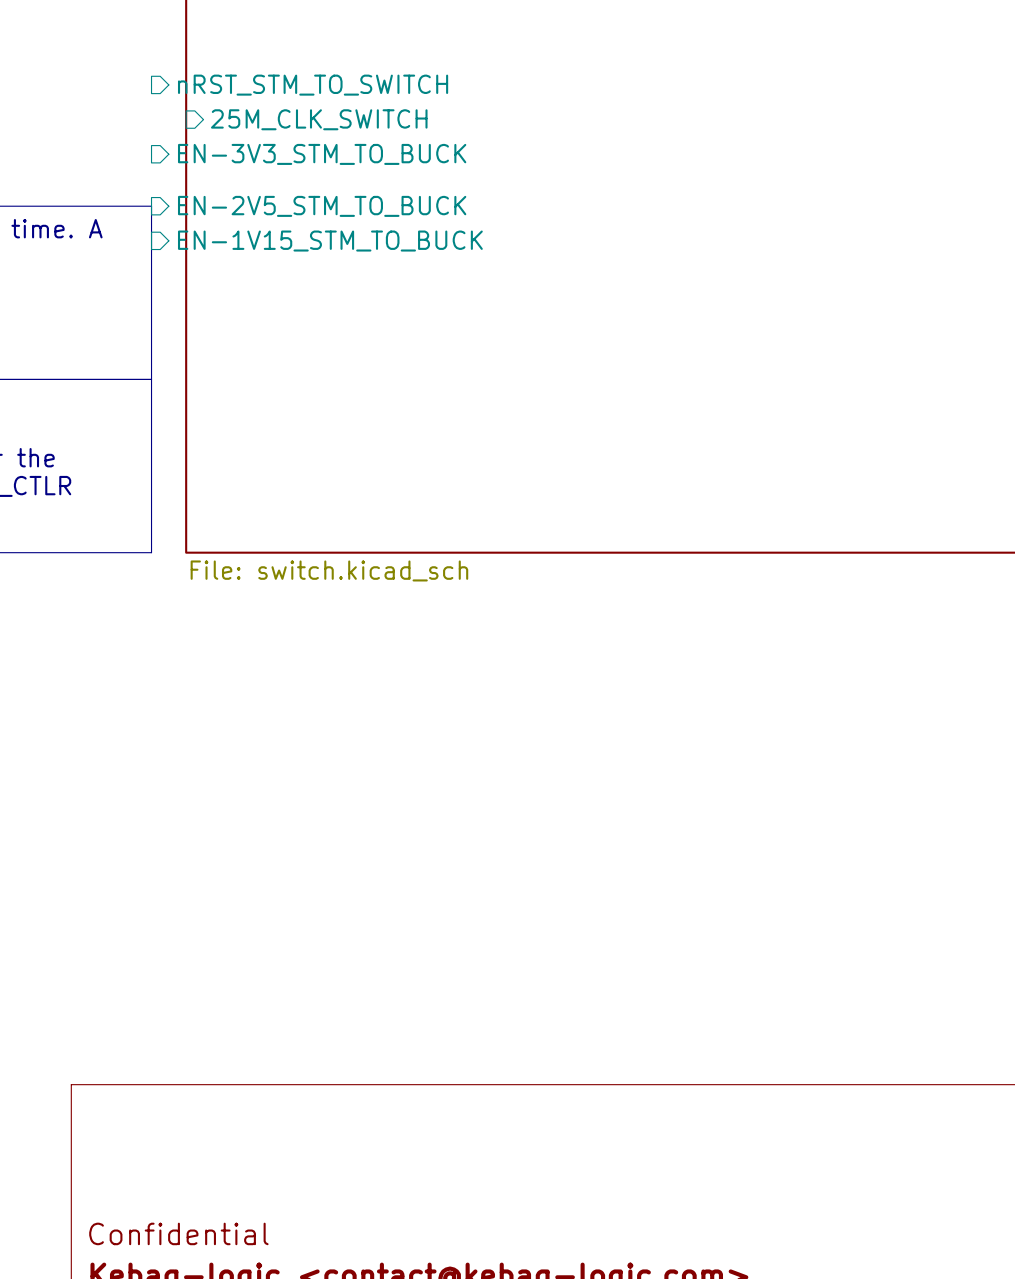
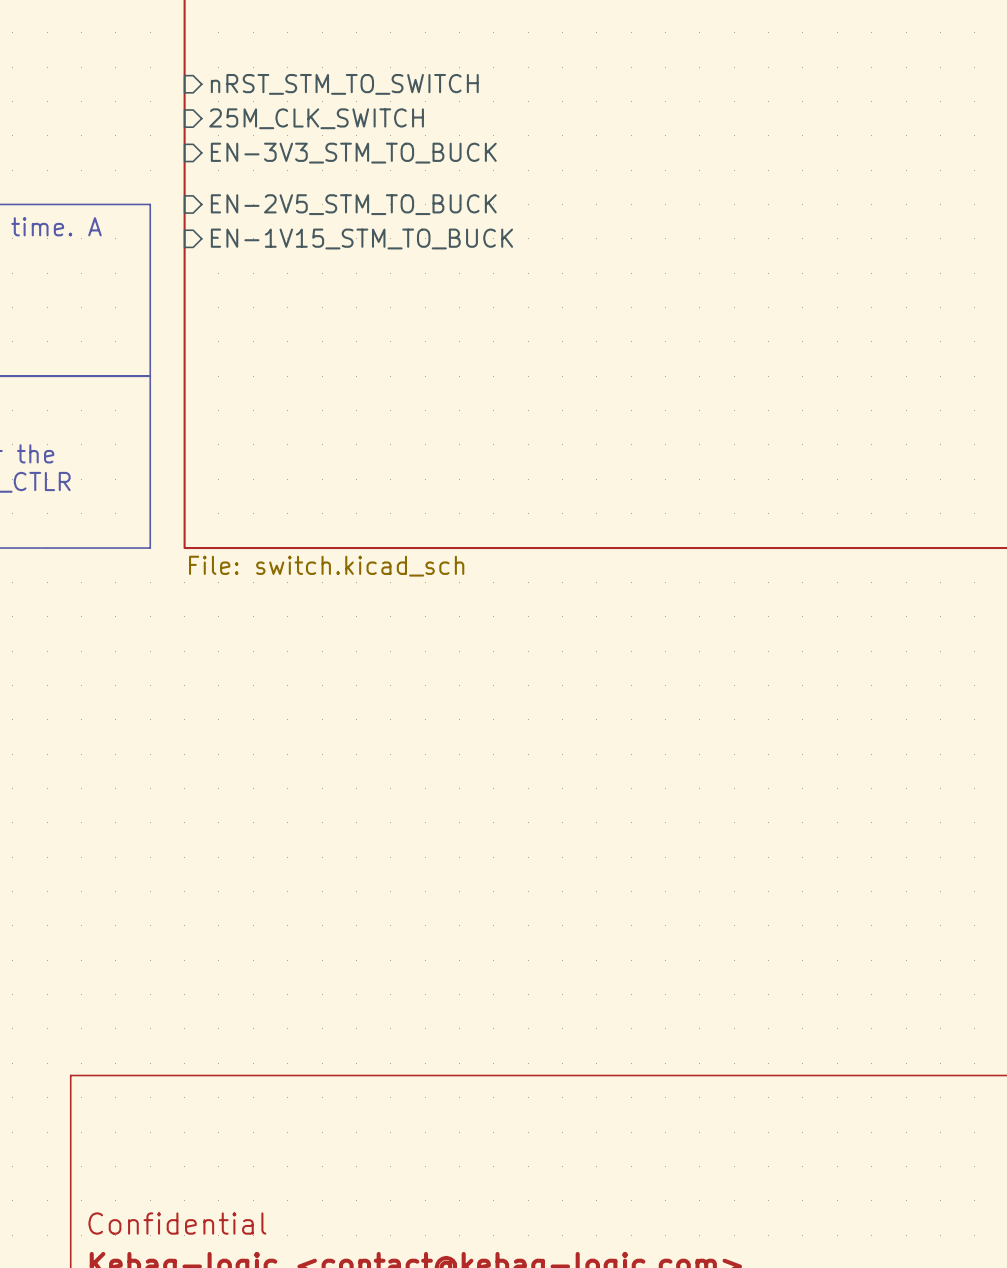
sheet pin position: nRST_STM_TO_SWITCH (313, 85) -> nRST_STM_TO_SWITCH (344, 84)
sheet pin position: EN-3V3_STM_TO_BUCK (322, 154) -> EN-3V3_STM_TO_BUCK (353, 153)
sheet pin position: EN-2V5_STM_TO_BUCK (322, 206) -> EN-2V5_STM_TO_BUCK (353, 204)
sheet pin position: EN-1V15_STM_TO_BUCK (330, 241) -> EN-1V15_STM_TO_BUCK (361, 239)

